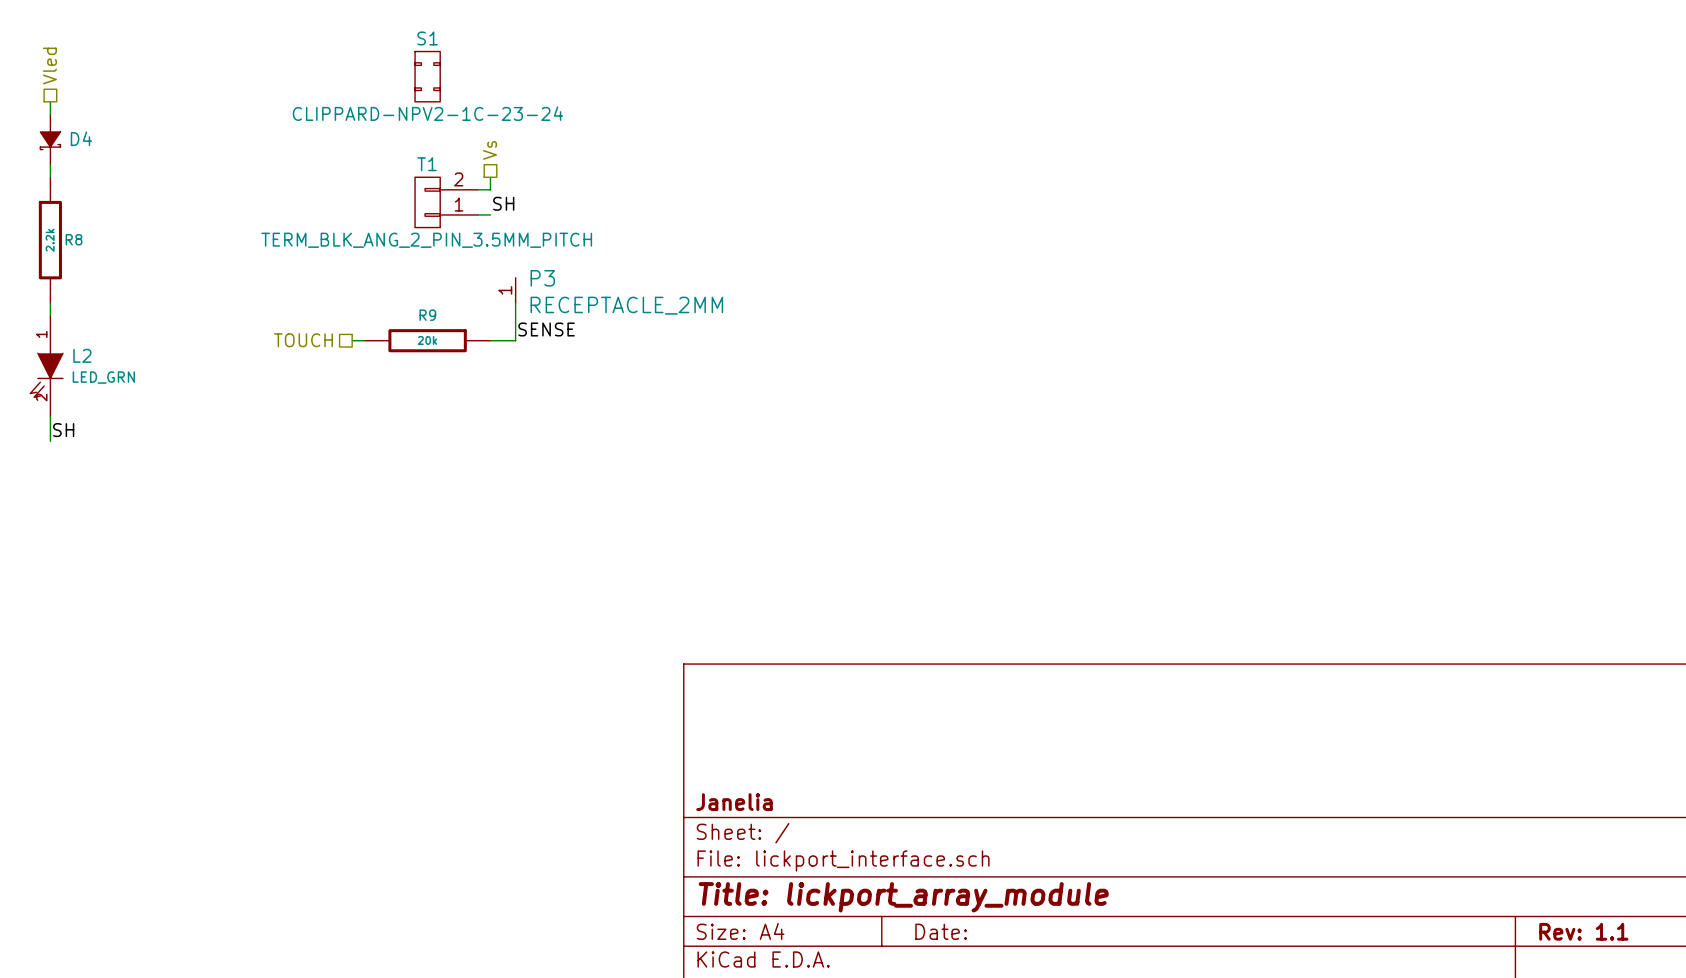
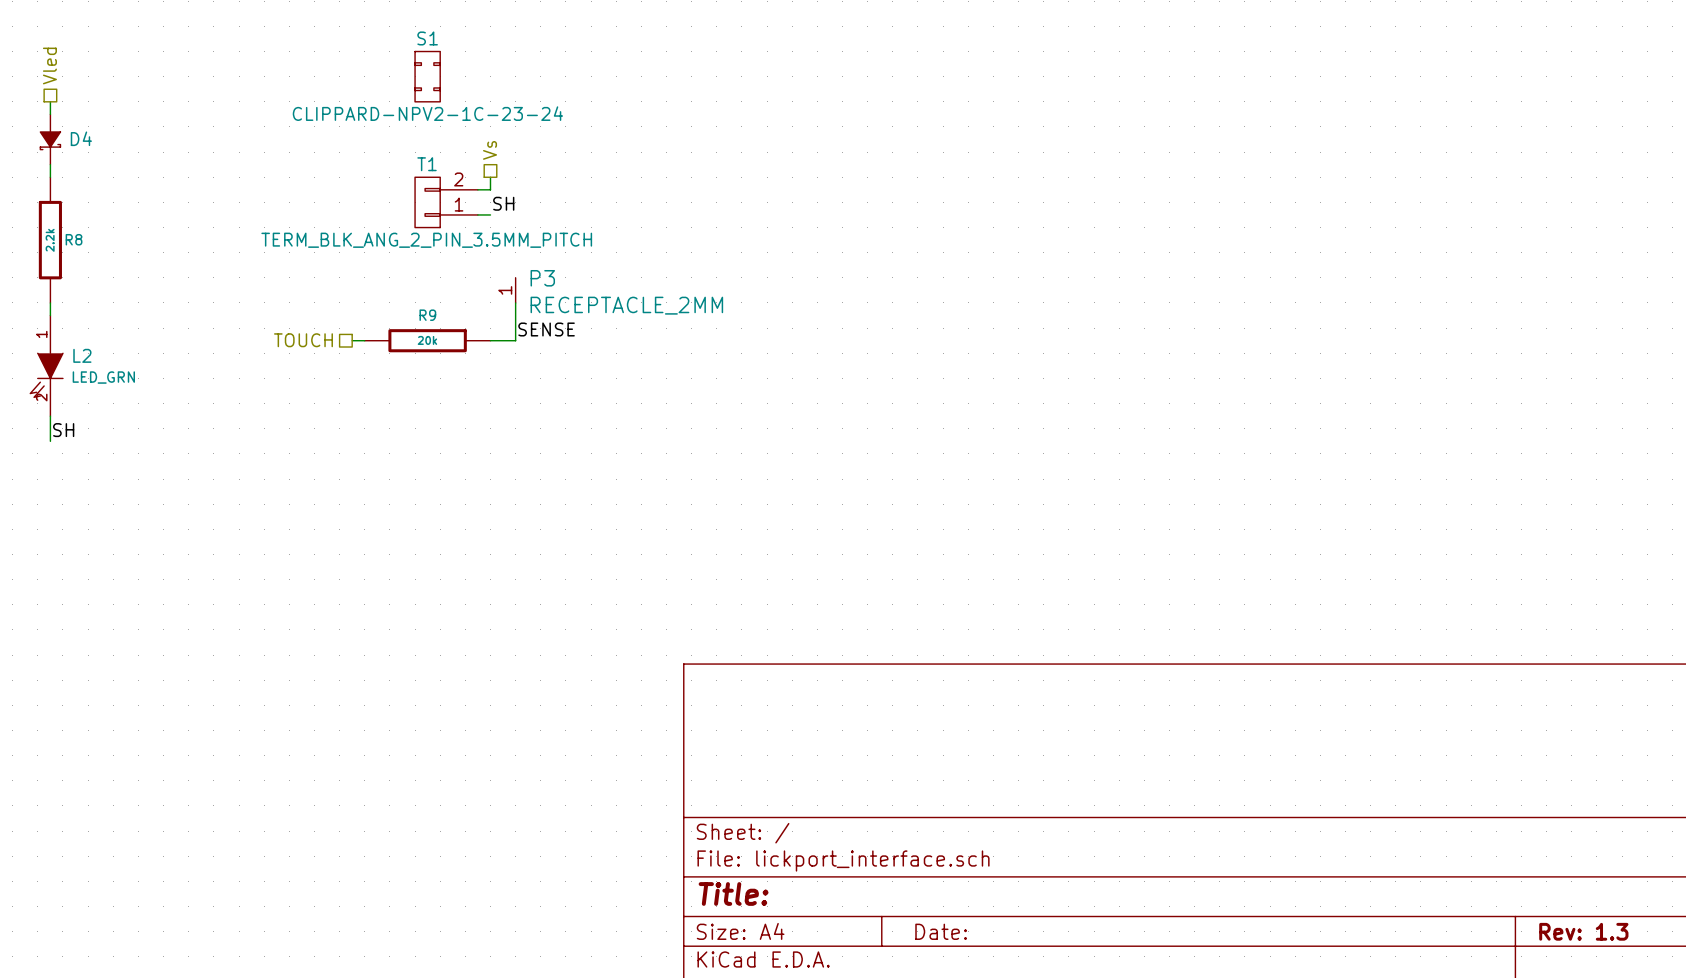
title block: Janelia (734, 802) -> none
title block: Title: lickport_array_module (903, 897) -> Title: (733, 893)
title block: Rev: 1.1 (1583, 931) -> Rev: 1.3 (1583, 931)

